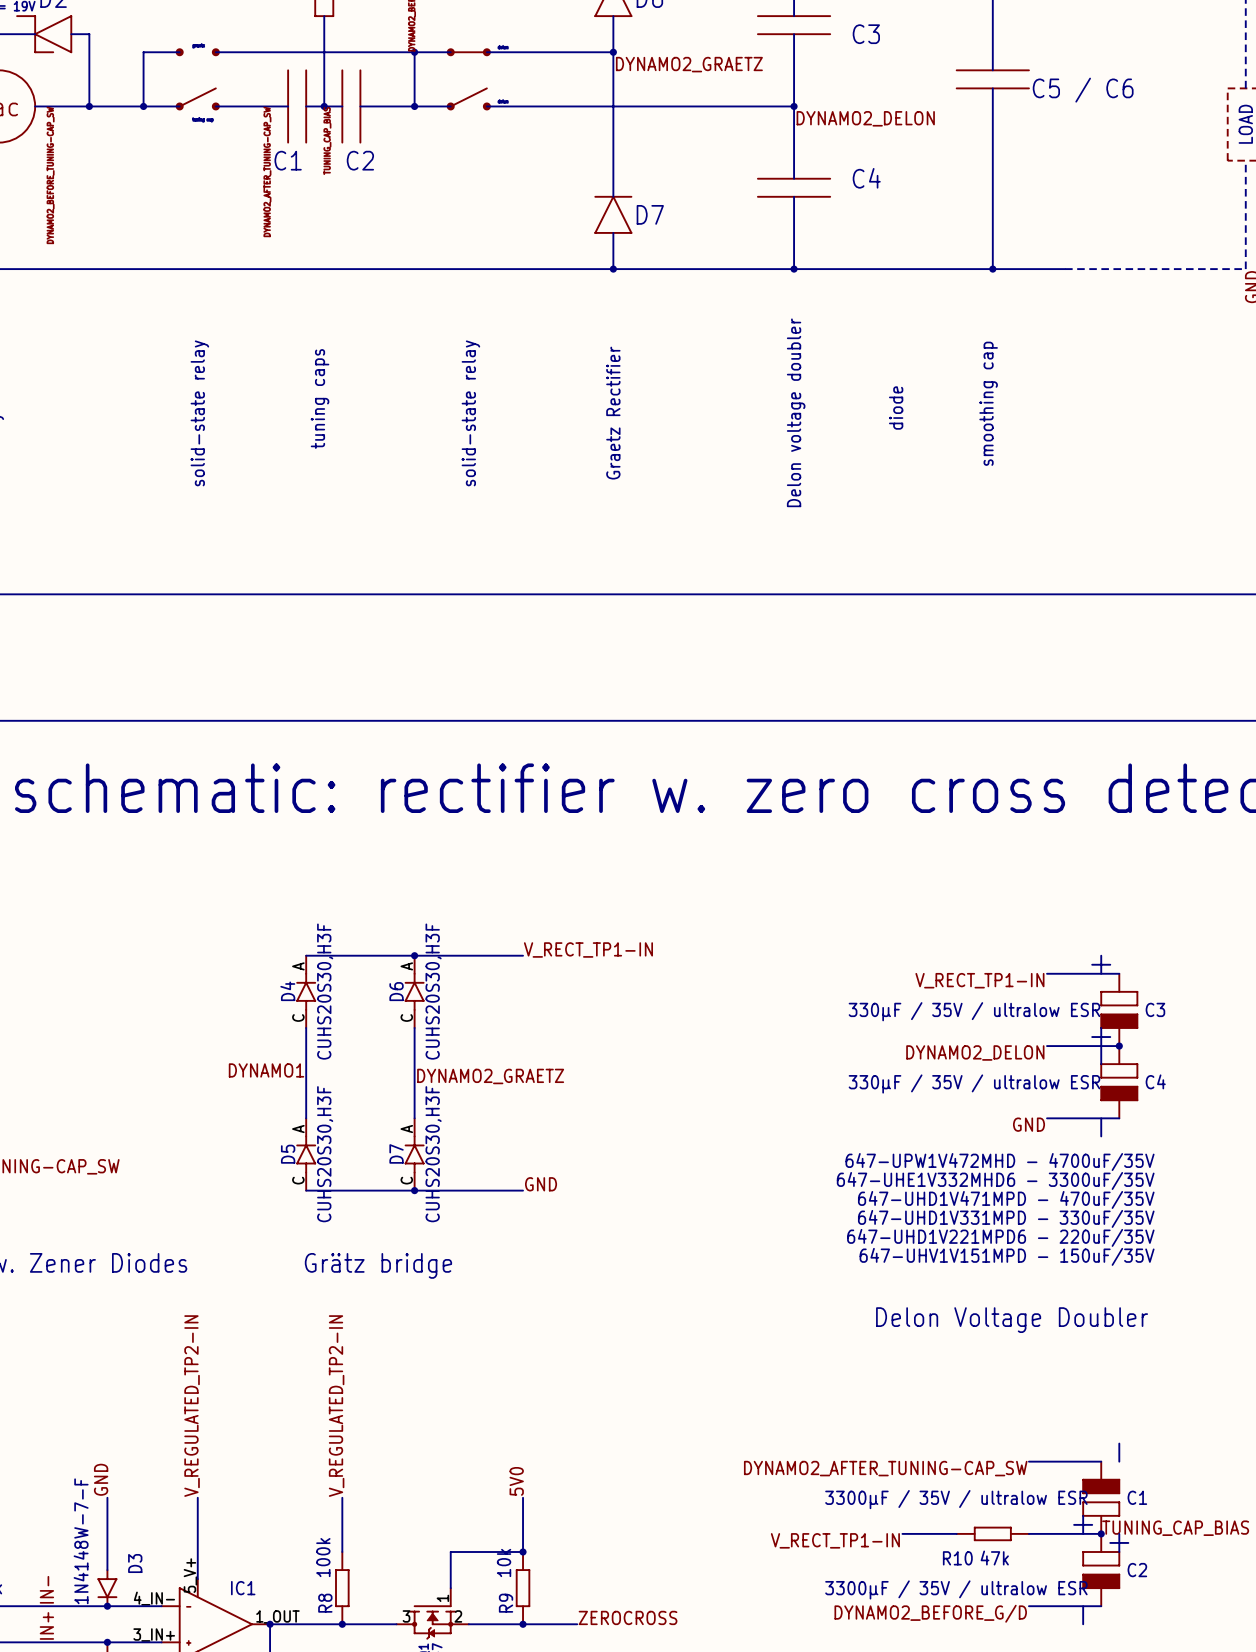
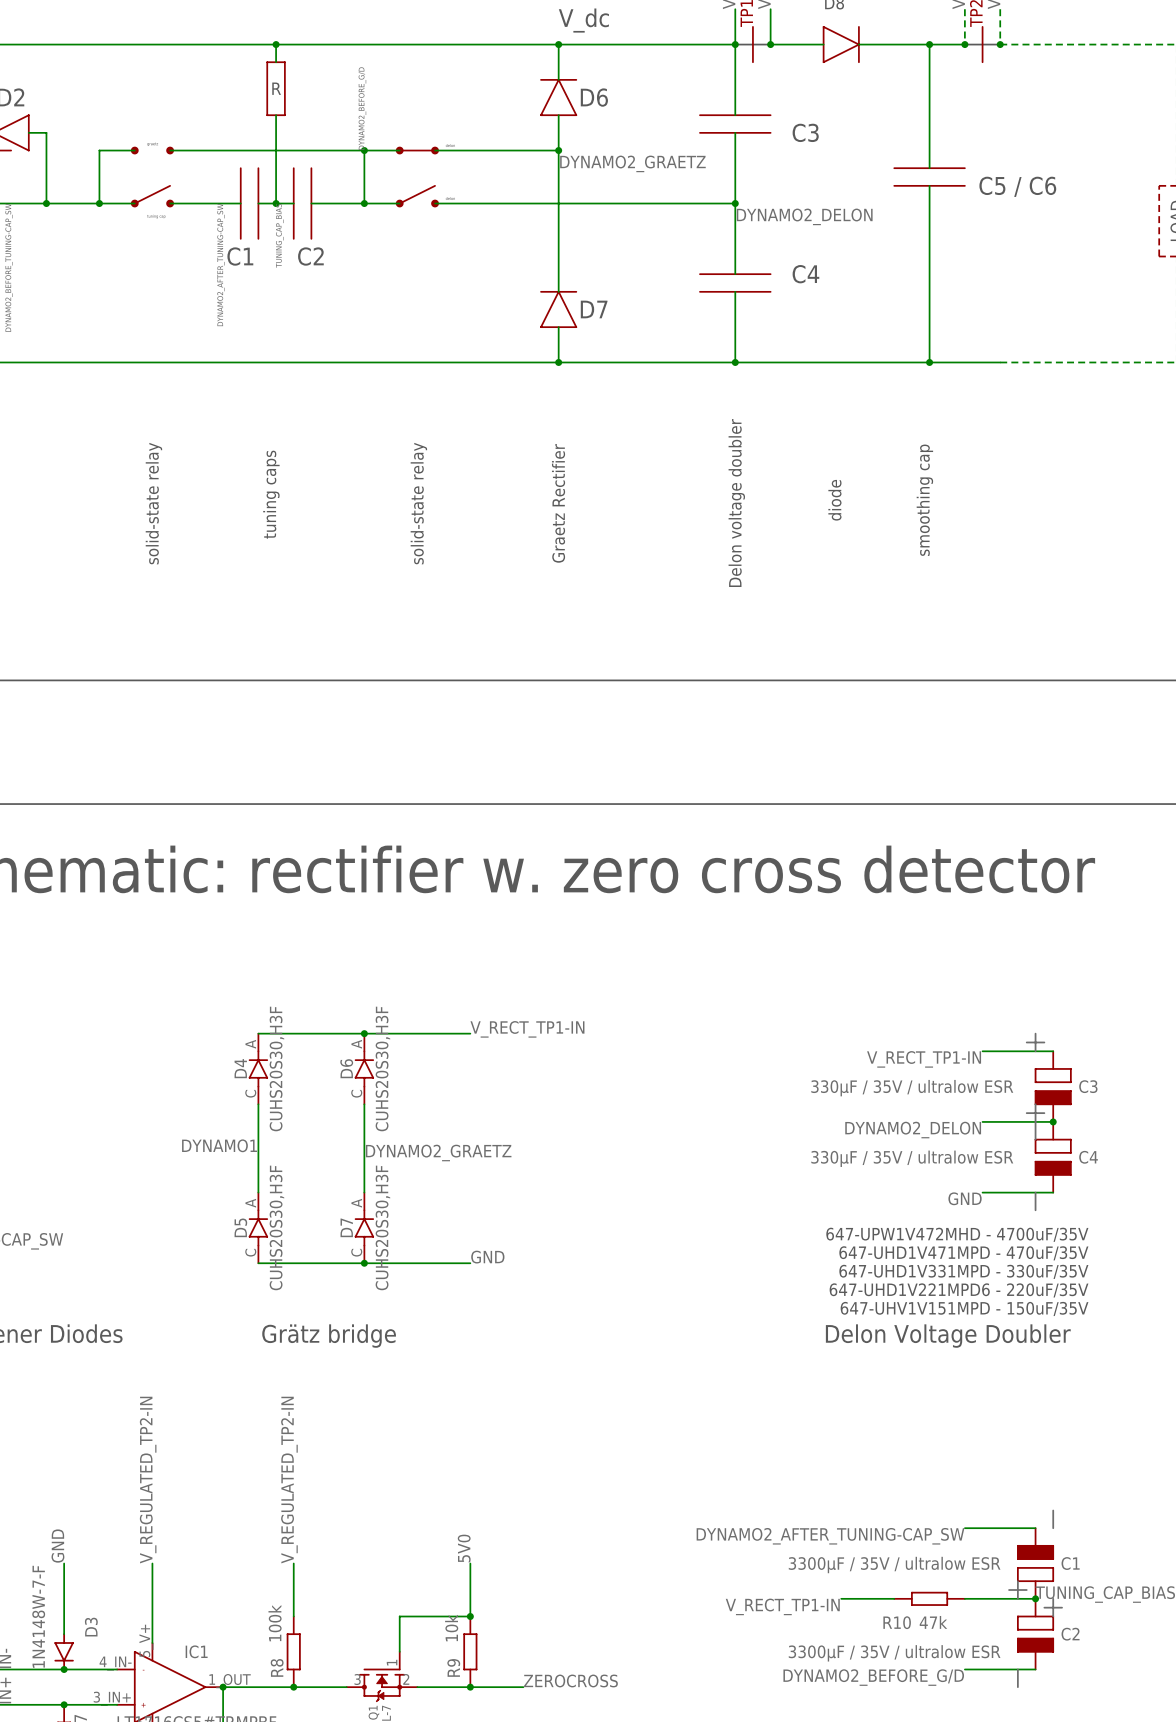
text: 647-UHE1V332MHD6 - 3300uF/35V (995, 1180) -> 647-UHD1V471MPD - 470uF/35V (963, 1253)
text: 647-UHD1V471MPD - 470uF/35V (1006, 1199) -> 647-UHD1V331MPD - 330uF/35V (963, 1271)
text: 647-UHD1V331MPD - 330uF/35V (1006, 1218) -> 647-UHD1V221MPD6 - 220uF/35V (959, 1290)
text: 647-UHD1V221MPD6 - 220uF/35V (1000, 1237) -> 647-UHV1V151MPD - 150uF/35V (964, 1308)
text: 647-UHV1V151MPD - 150uF/35V (1007, 1256) -> none
text position: Delon Voltage Doubler (1012, 1320) -> Delon Voltage Doubler (948, 1336)

